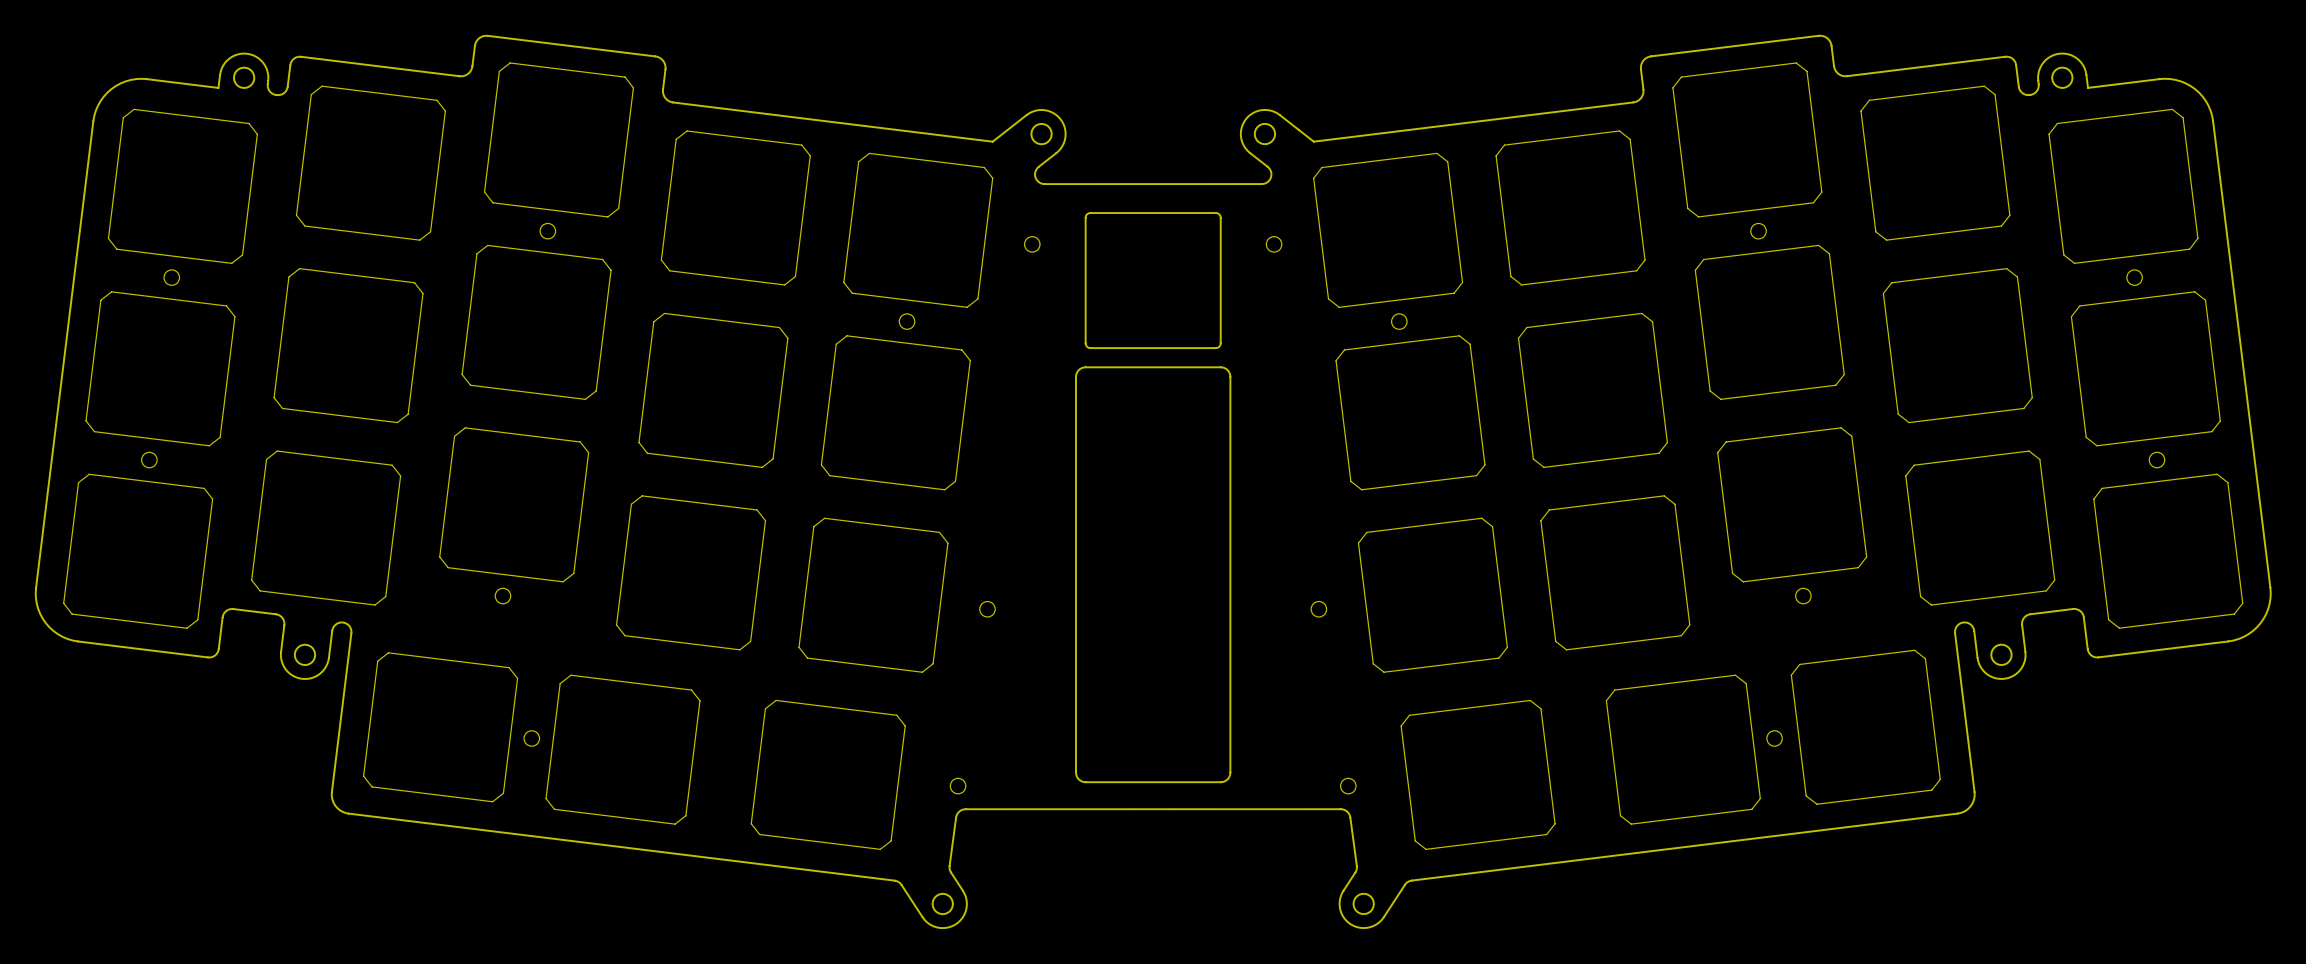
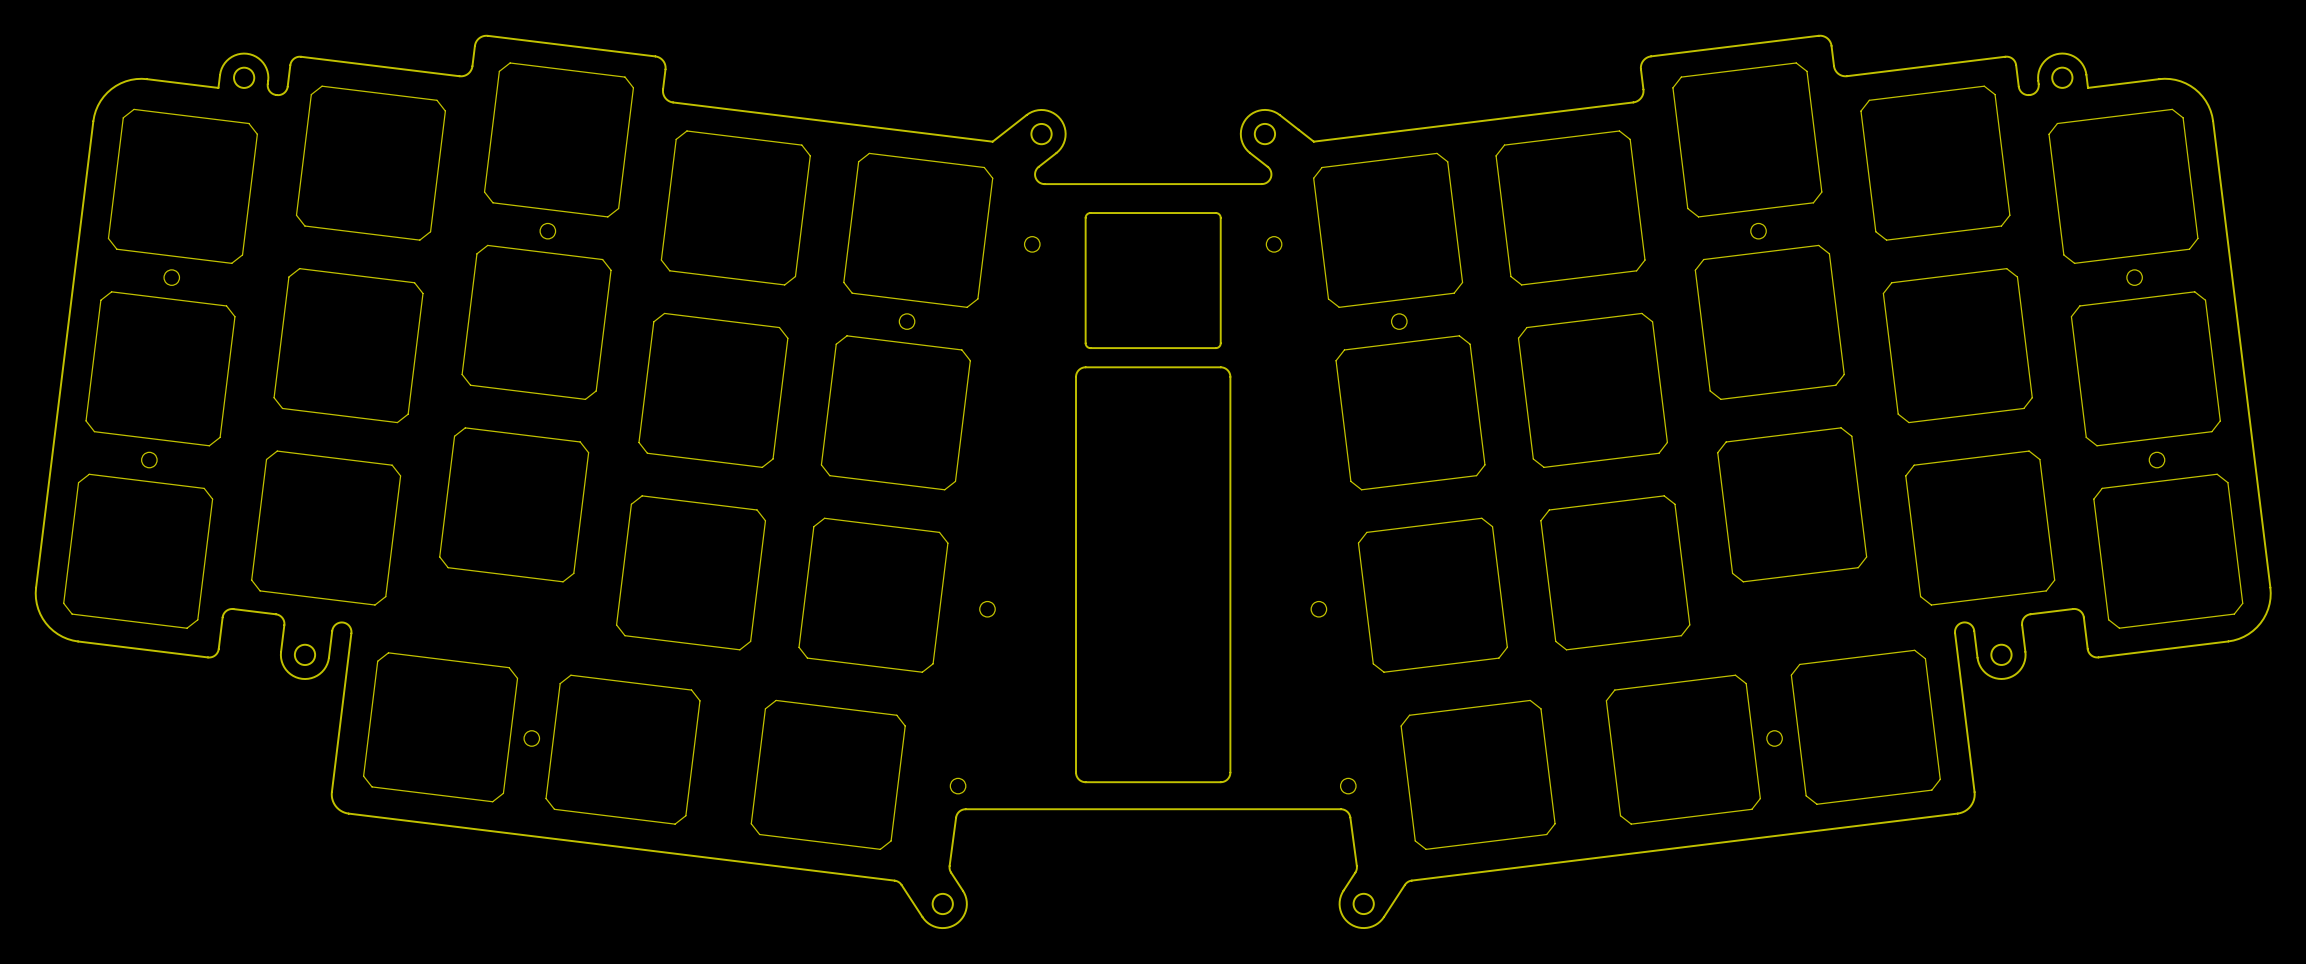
drawing: [495, 588, 511, 605] -> none
drawing: [1795, 588, 1812, 605] -> none

